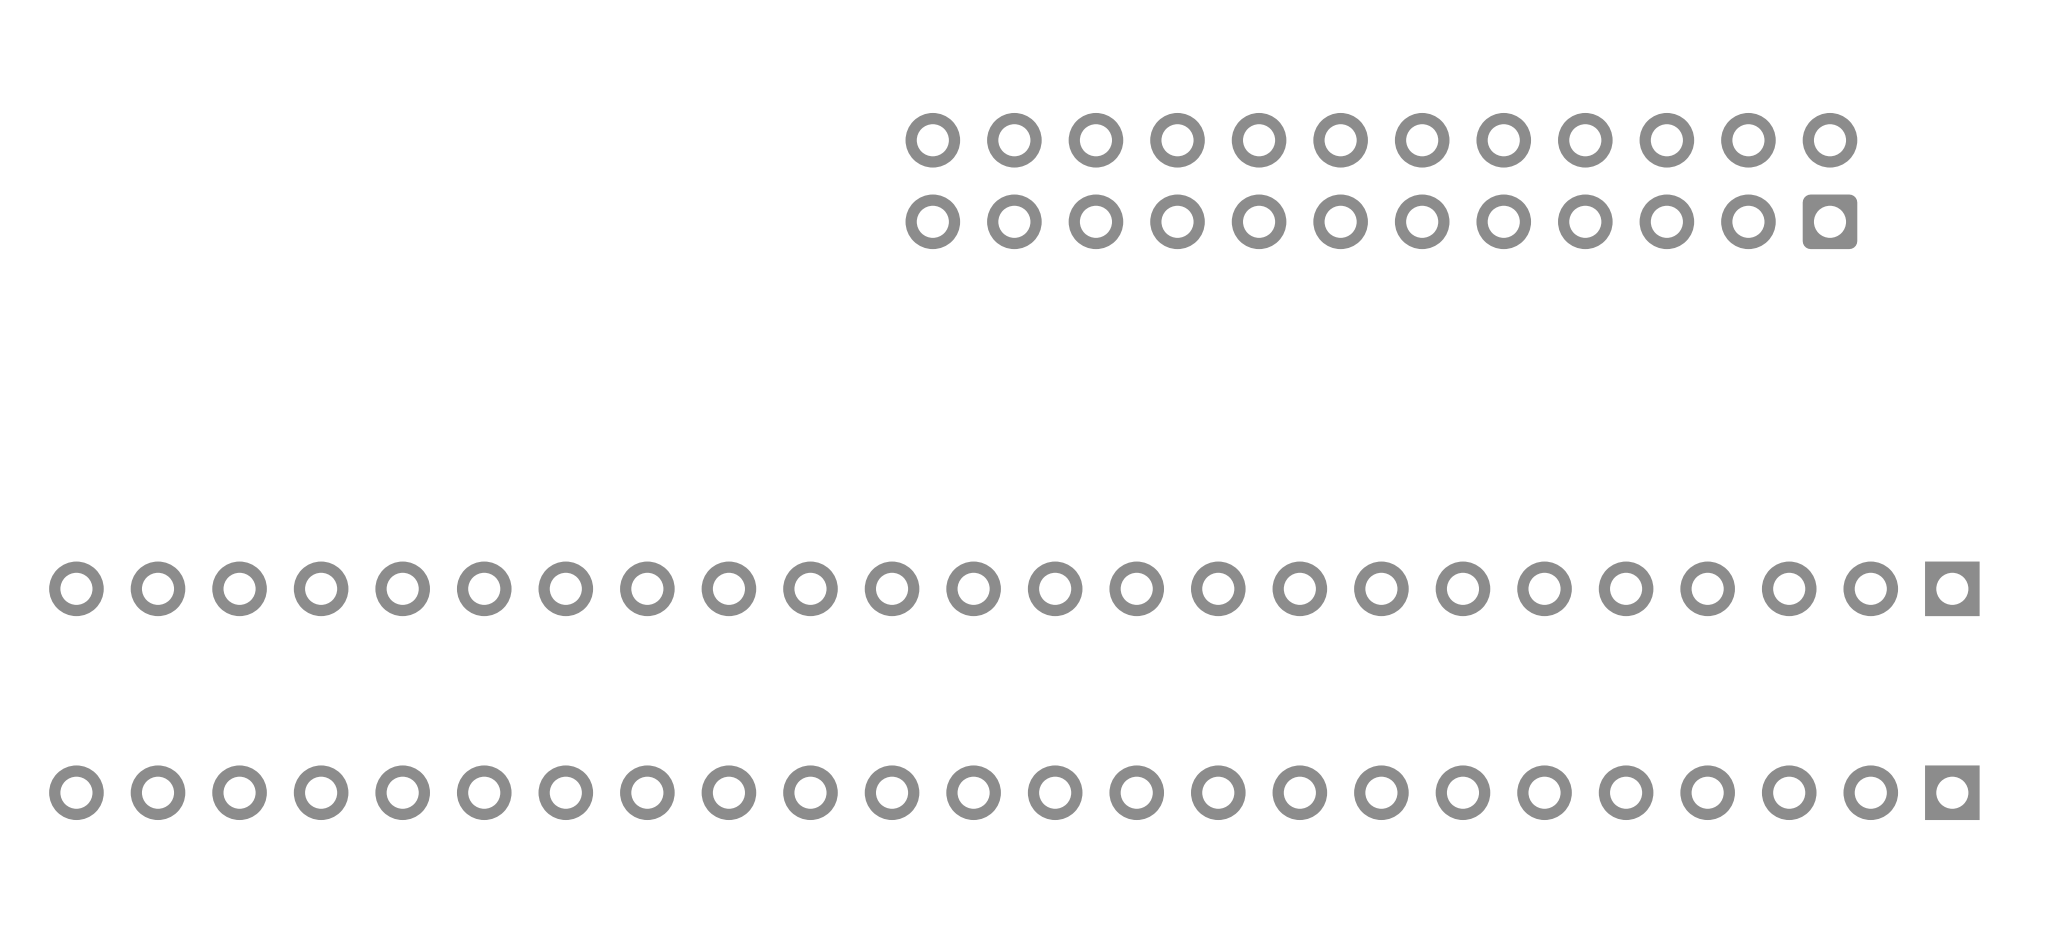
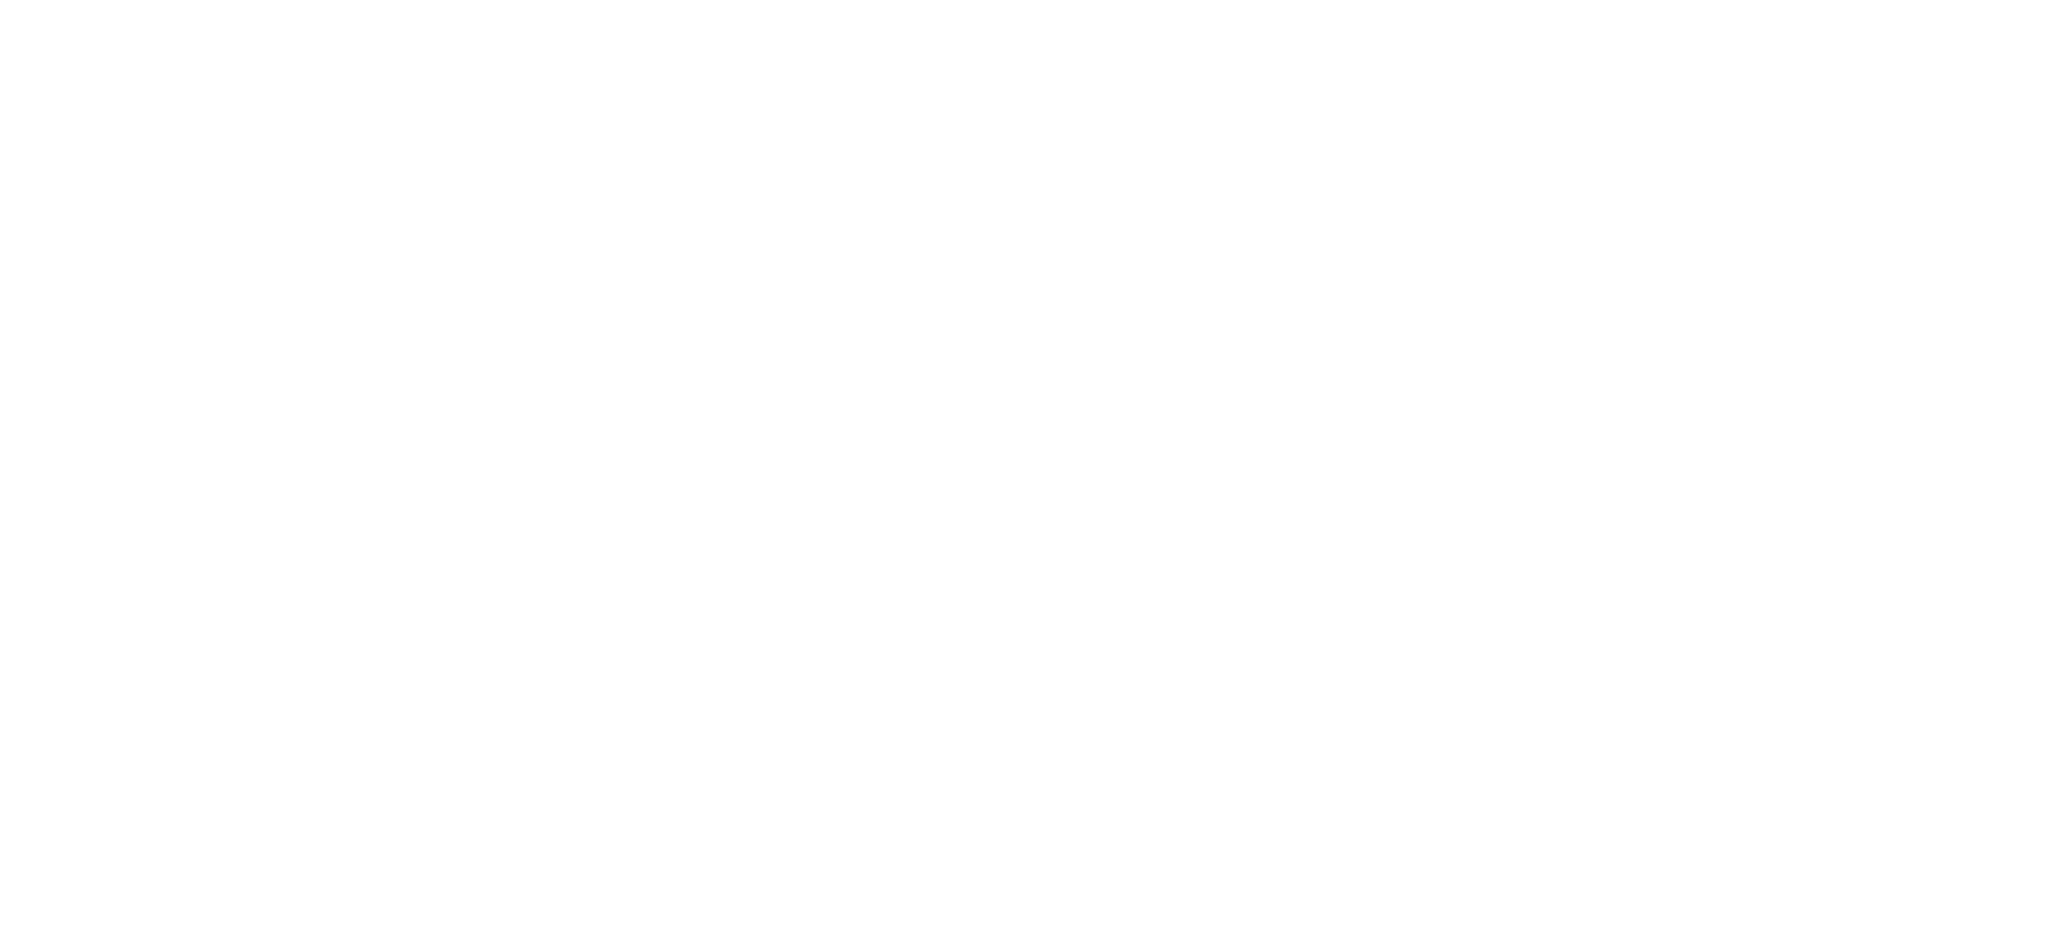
part: (1381, 181) -> none
part: (1014, 588) -> none
part: (1014, 792) -> none

